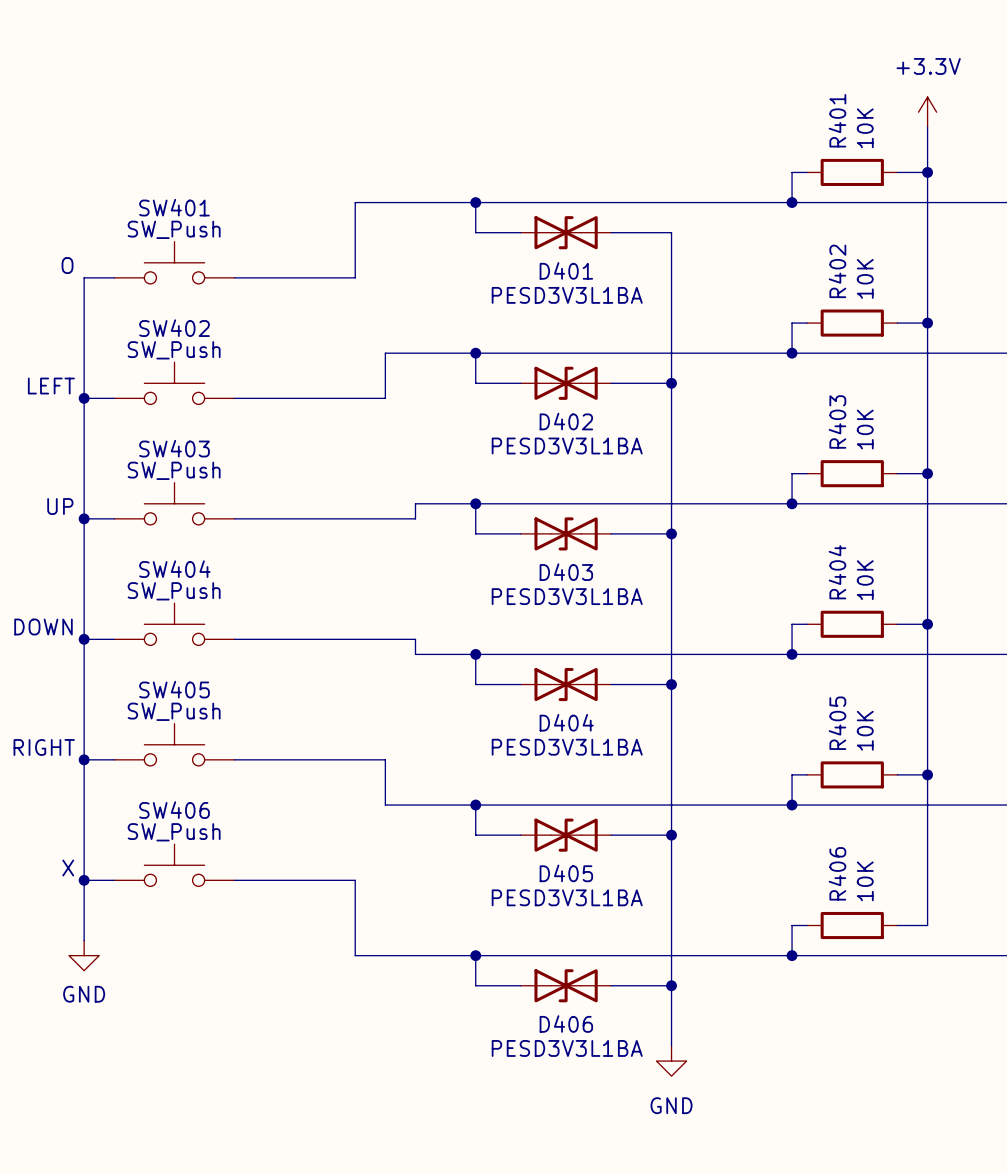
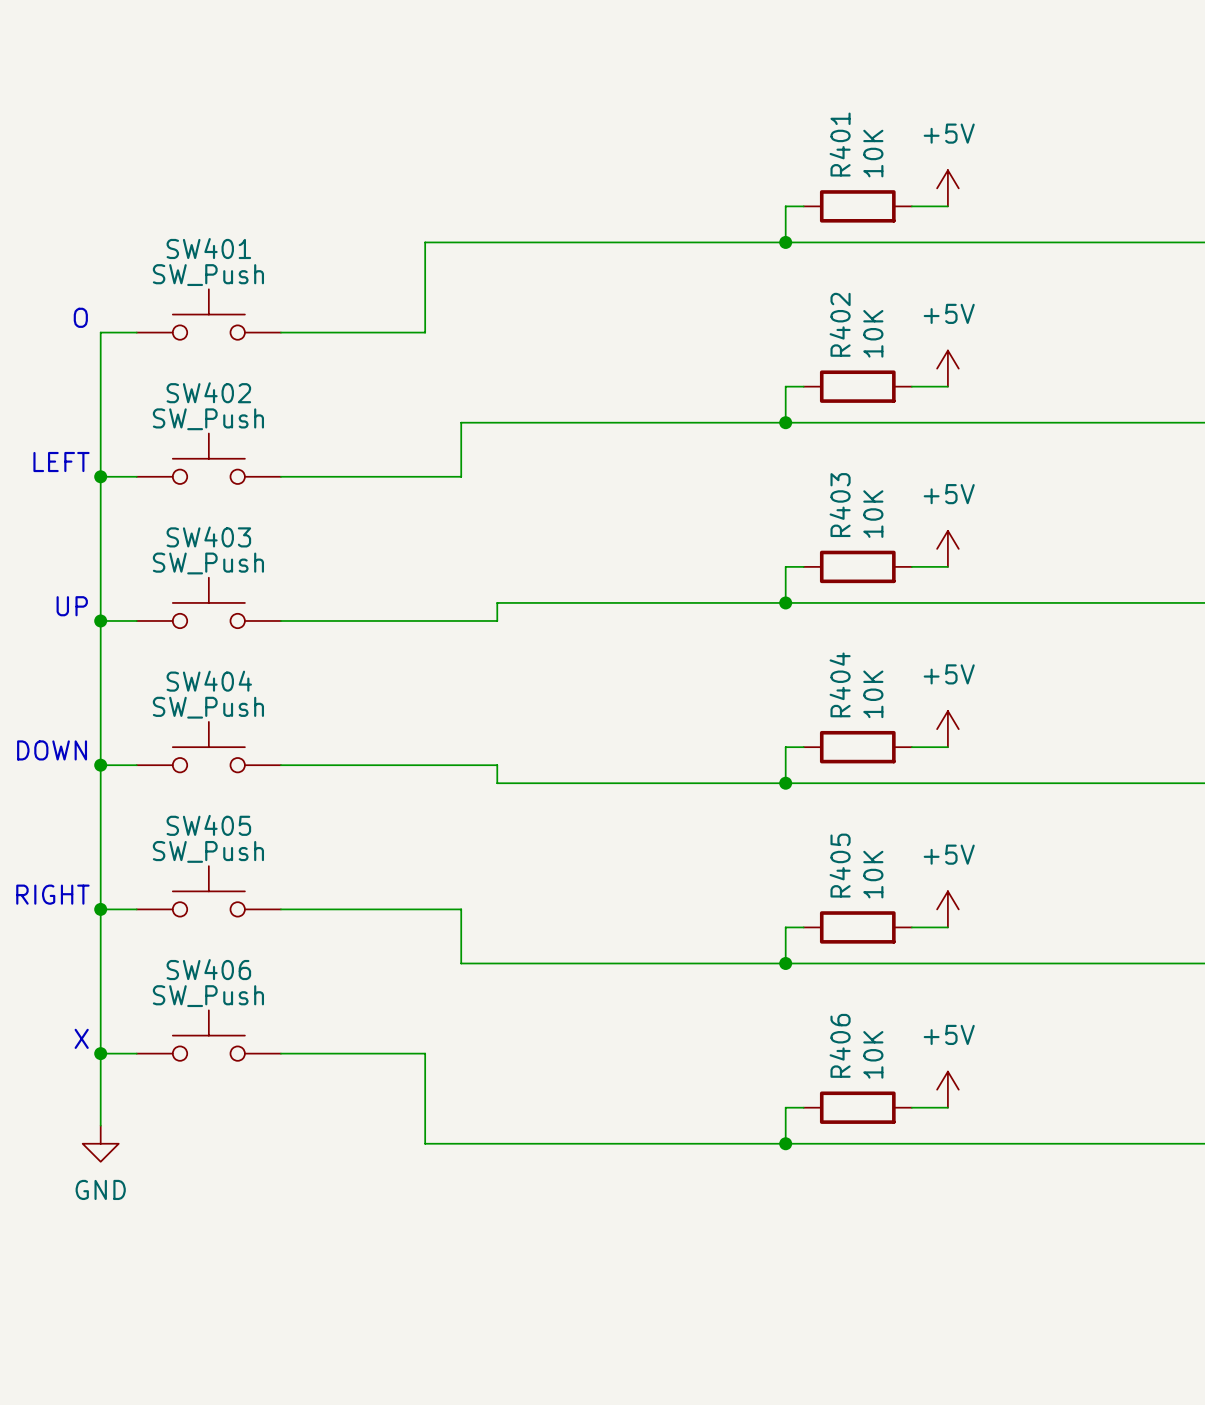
power symbol: +3.3V (927, 112) -> none
wire: (927, 127) (927, 925) (897, 925) -> none
power symbol: none -> +5V (947, 188)
wire: (807, 172) (792, 172) (792, 202) -> (803, 206) (785, 206) (785, 242)
R401 position: (852, 172) -> (857, 206)
wire: (897, 172) (927, 172) -> (911, 206) (947, 206)
junction: (927, 172) -> none
wire: (475, 202) (475, 232) (520, 232) -> none
junction: (475, 202) -> none
junction: none -> (785, 242)
junction: (792, 202) -> none
D401: PESD3V3L1BA (566, 232) -> none
wire: (611, 232) (671, 232) (671, 1046) -> none
power symbol: none -> +5V (947, 368)
wire: (807, 323) (792, 323) (792, 353) -> (803, 386) (785, 386) (785, 422)
R402 position: (852, 323) -> (857, 386)
wire: (897, 323) (927, 323) -> (911, 386) (947, 386)
junction: (927, 323) -> none
wire: (475, 353) (475, 383) (520, 383) -> none
junction: (475, 353) -> none
junction: (792, 353) -> none
D402: PESD3V3L1BA (566, 383) -> none
wire: (611, 383) (671, 383) -> none
junction position: (671, 383) -> (785, 422)
power symbol: none -> +5V (947, 548)
wire: (807, 473) (792, 473) (792, 503) -> (803, 566) (785, 566) (785, 602)
R403 position: (852, 473) -> (857, 566)
wire: (897, 473) (927, 473) -> (911, 566) (947, 566)
junction: (927, 473) -> none
wire: (475, 503) (475, 533) (520, 533) -> none
junction: (475, 503) -> none
junction: (792, 503) -> none
D403: PESD3V3L1BA (566, 533) -> none
wire: (611, 533) (671, 533) -> none
junction position: (671, 533) -> (785, 602)
power symbol: none -> +5V (947, 729)
wire: (807, 624) (792, 624) (792, 654) -> (803, 747) (785, 747) (785, 783)
R404 position: (852, 624) -> (857, 747)
wire: (897, 624) (927, 624) -> (911, 747) (947, 747)
junction: (927, 624) -> none
wire: (475, 654) (475, 684) (520, 684) -> none
junction: (475, 654) -> none
junction: (792, 654) -> none
D404: PESD3V3L1BA (566, 684) -> none
wire: (611, 684) (671, 684) -> none
junction position: (671, 684) -> (785, 783)
power symbol: none -> +5V (947, 909)
wire: (807, 774) (792, 774) (792, 805) -> (803, 927) (785, 927) (785, 963)
R405 position: (852, 774) -> (857, 927)
wire: (897, 774) (927, 774) -> (911, 927) (947, 927)
junction: (927, 774) -> none
wire: (475, 805) (475, 835) (520, 835) -> none
junction: (475, 805) -> none
junction: (792, 805) -> none
D405: PESD3V3L1BA (566, 835) -> none
wire: (611, 835) (671, 835) -> none
junction position: (671, 835) -> (785, 963)
power symbol: none -> +5V (947, 1089)
wire: none -> (911, 1107) (947, 1107)
wire: (807, 925) (792, 925) (792, 955) -> (803, 1107) (785, 1107) (785, 1143)
R406 position: (852, 925) -> (857, 1107)
wire: (475, 955) (475, 985) (520, 985) -> none
junction: (475, 955) -> none
junction: (792, 955) -> none
D406: PESD3V3L1BA (566, 985) -> none
wire: (611, 985) (671, 985) -> none
junction position: (671, 985) -> (785, 1143)
power symbol: GND (671, 1061) -> none

